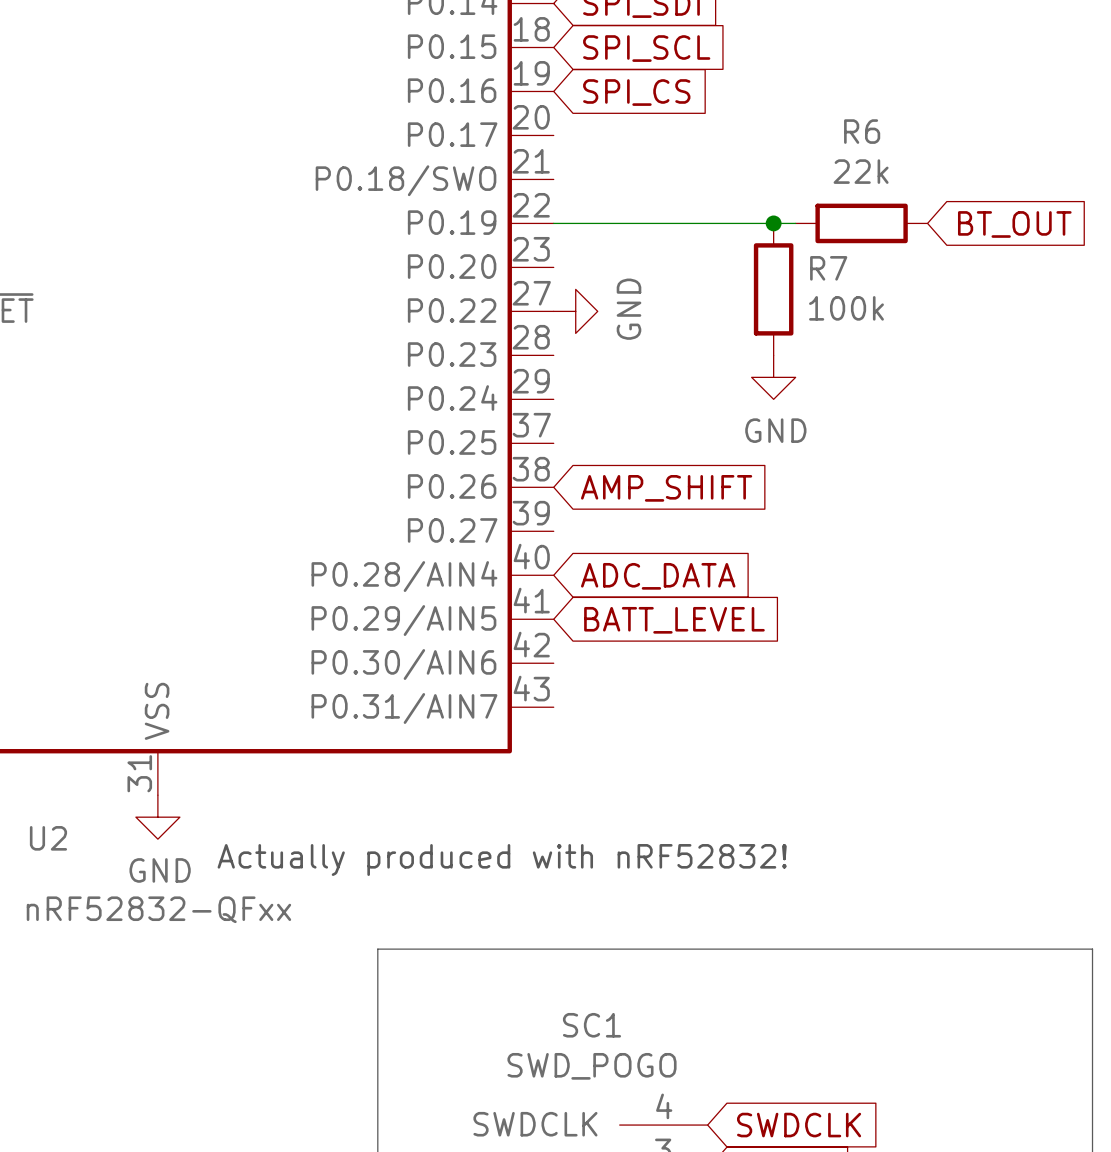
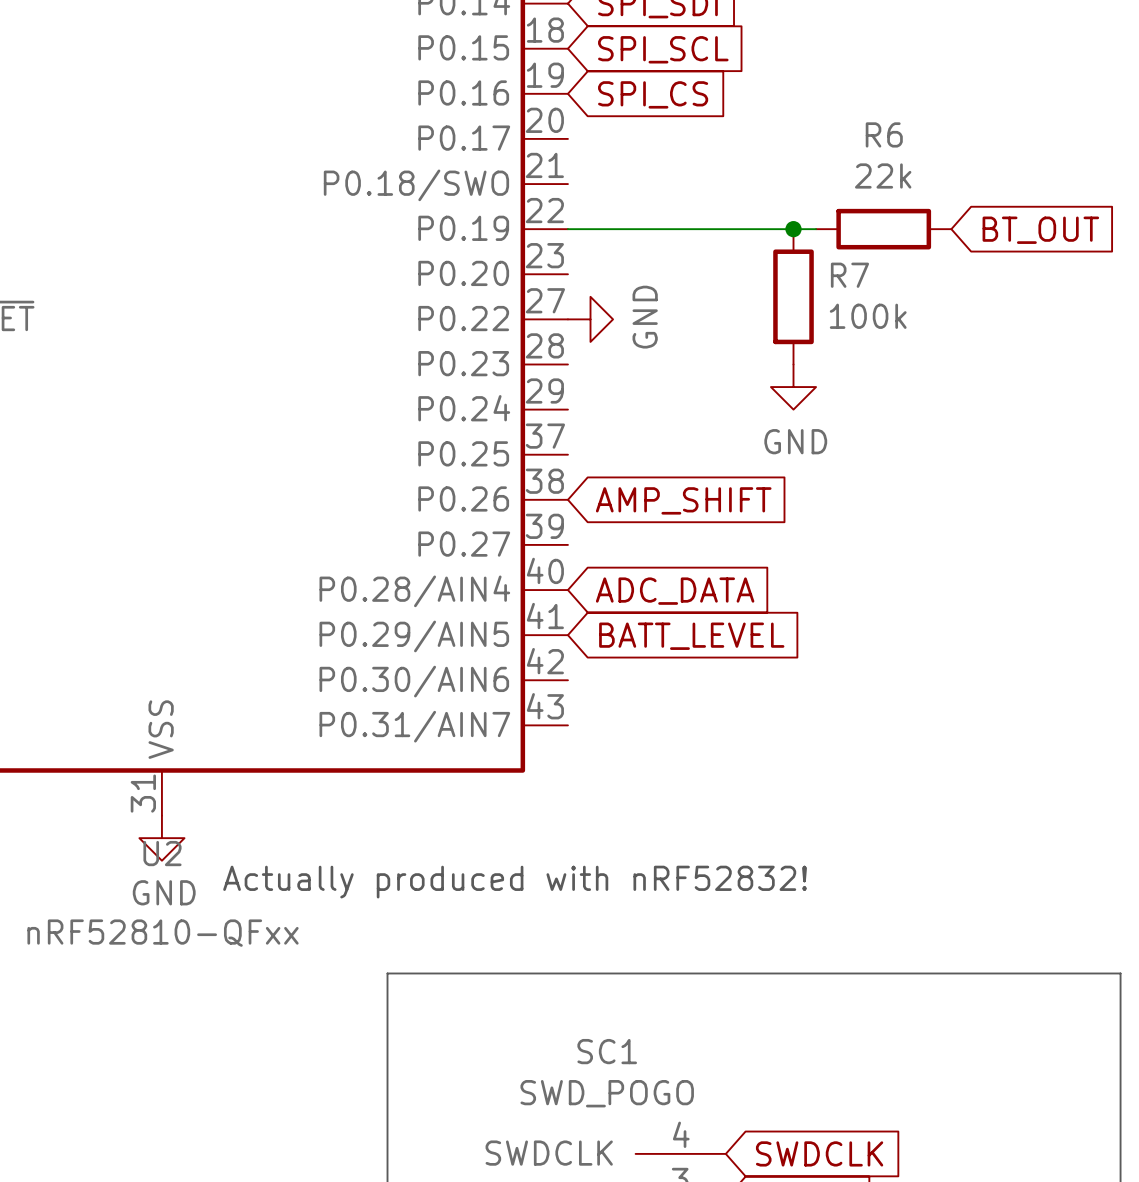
U2 name position: U2 (48, 838) -> U2 (162, 853)
U2 value: nRF52832-QFxx (158, 909) -> nRF52810-QFxx (163, 933)

